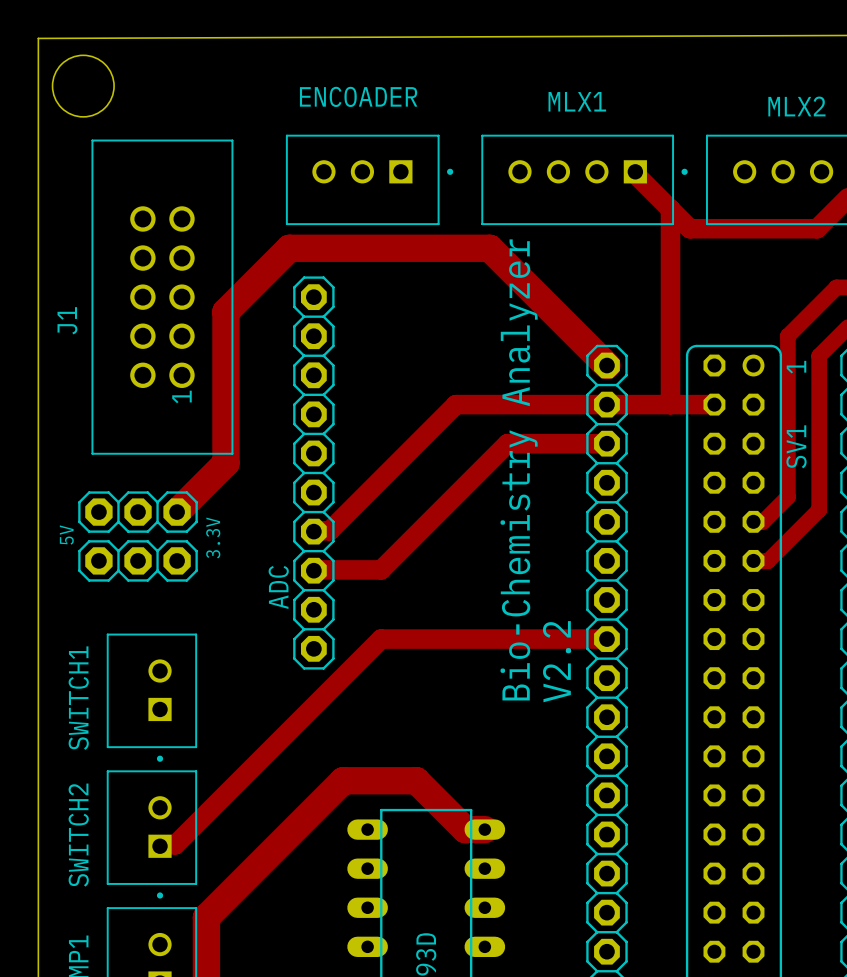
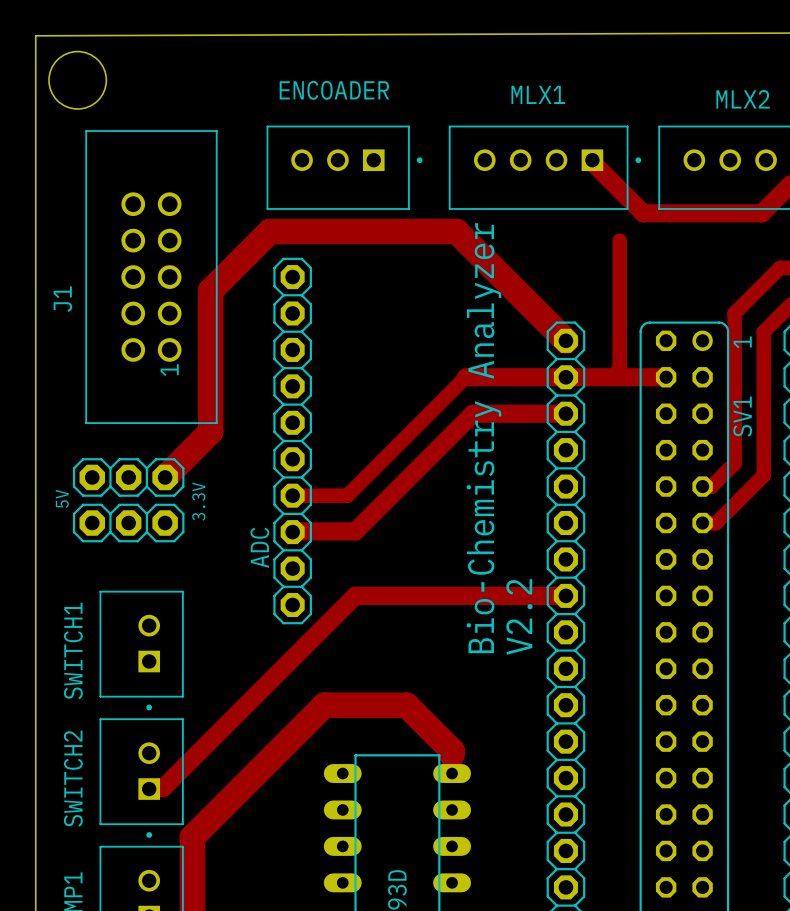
track: (670, 209) (670, 404) -> none
track: none -> (619, 240) (619, 369) (611, 377)
track: (499, 404) (455, 404) (329, 530) (313, 531) -> (465, 377) (347, 495) (292, 495)
track: (484, 829) (465, 829) (416, 780) (343, 780) (206, 917) -> (452, 755) (452, 750) (406, 705) (324, 705) (192, 837) (192, 855)

